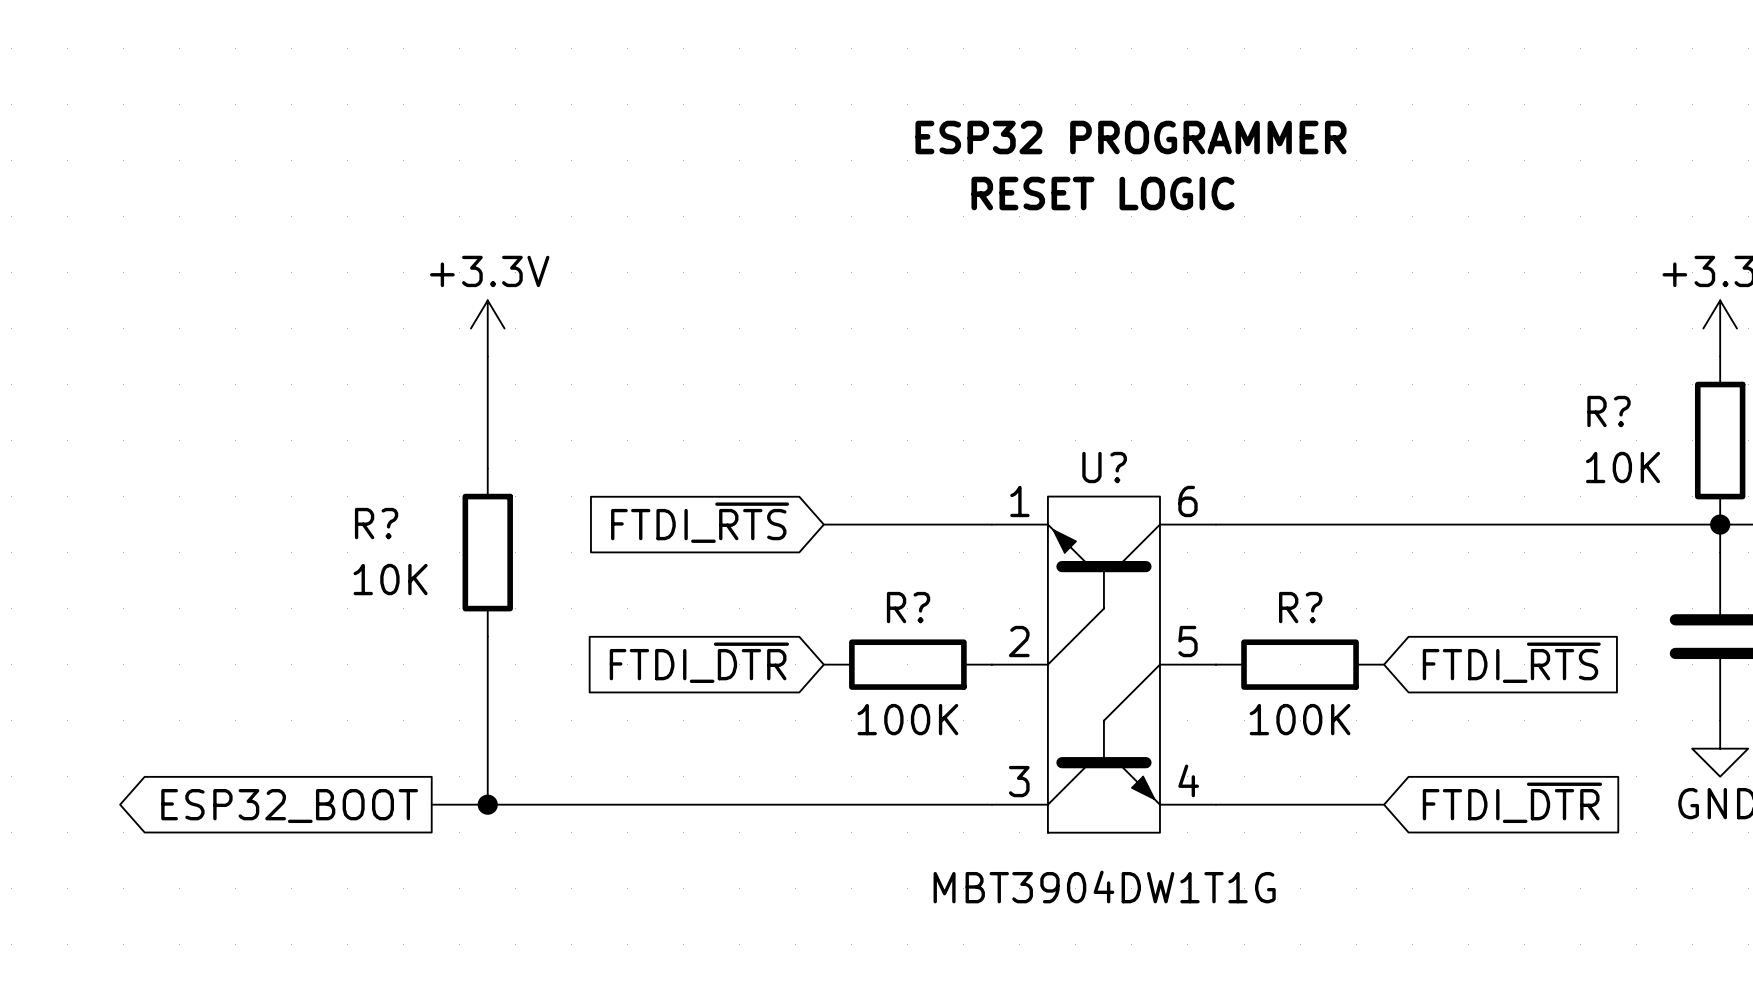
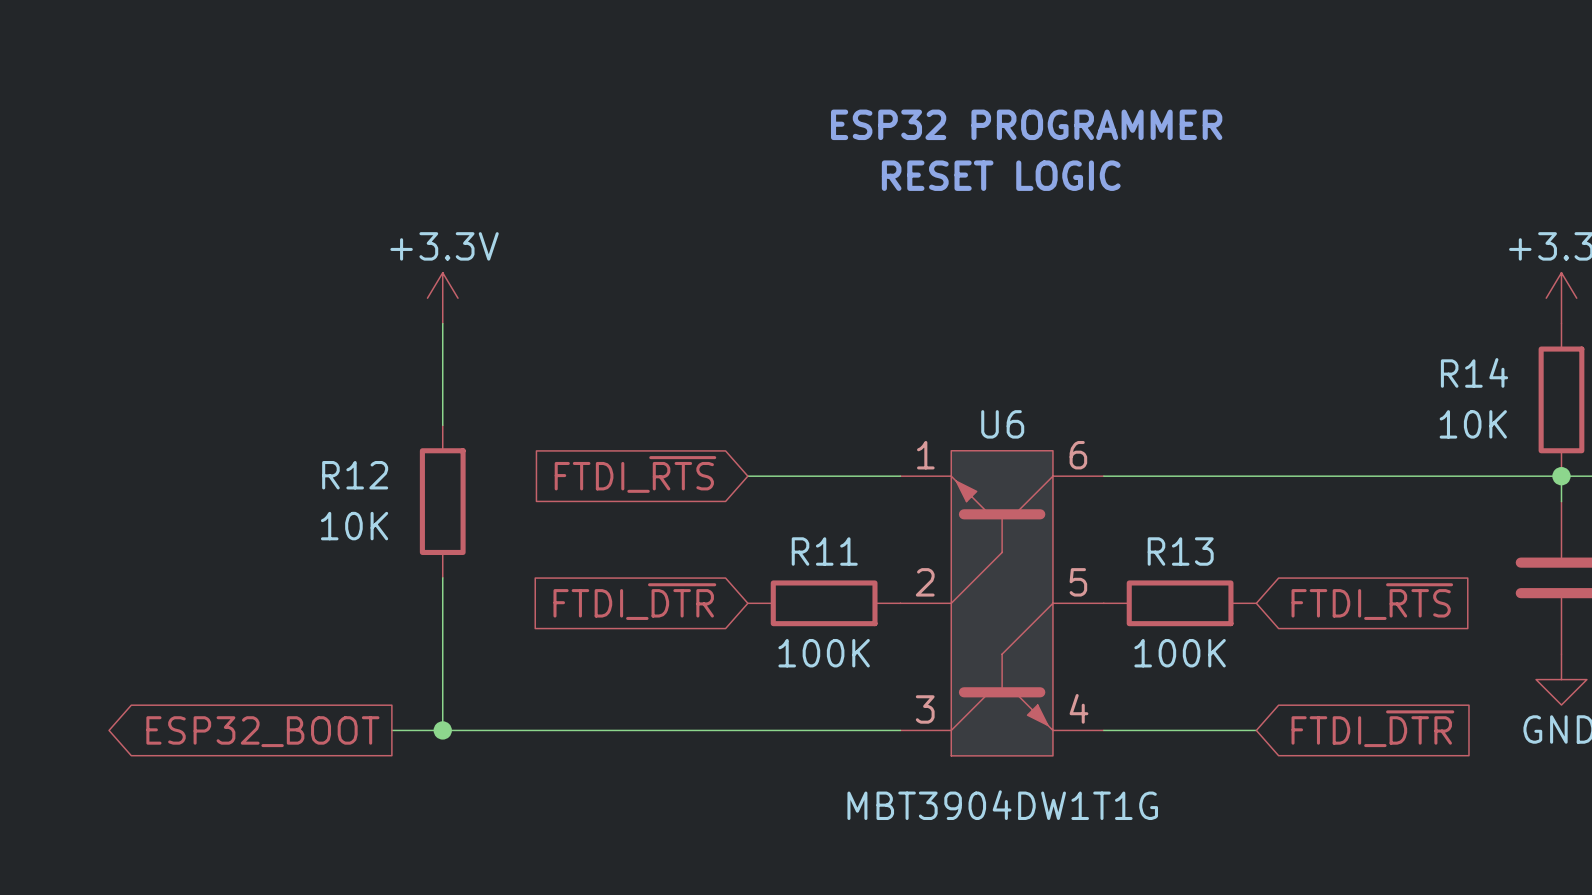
R? name: R? (1609, 411) -> R14 (1474, 372)
U? name: U? (1104, 467) -> U6 (1002, 424)
R? name: R? (376, 523) -> R12 (355, 475)
R? name: R? (908, 607) -> R11 (824, 551)
R? name: R? (1300, 607) -> R13 (1180, 551)

